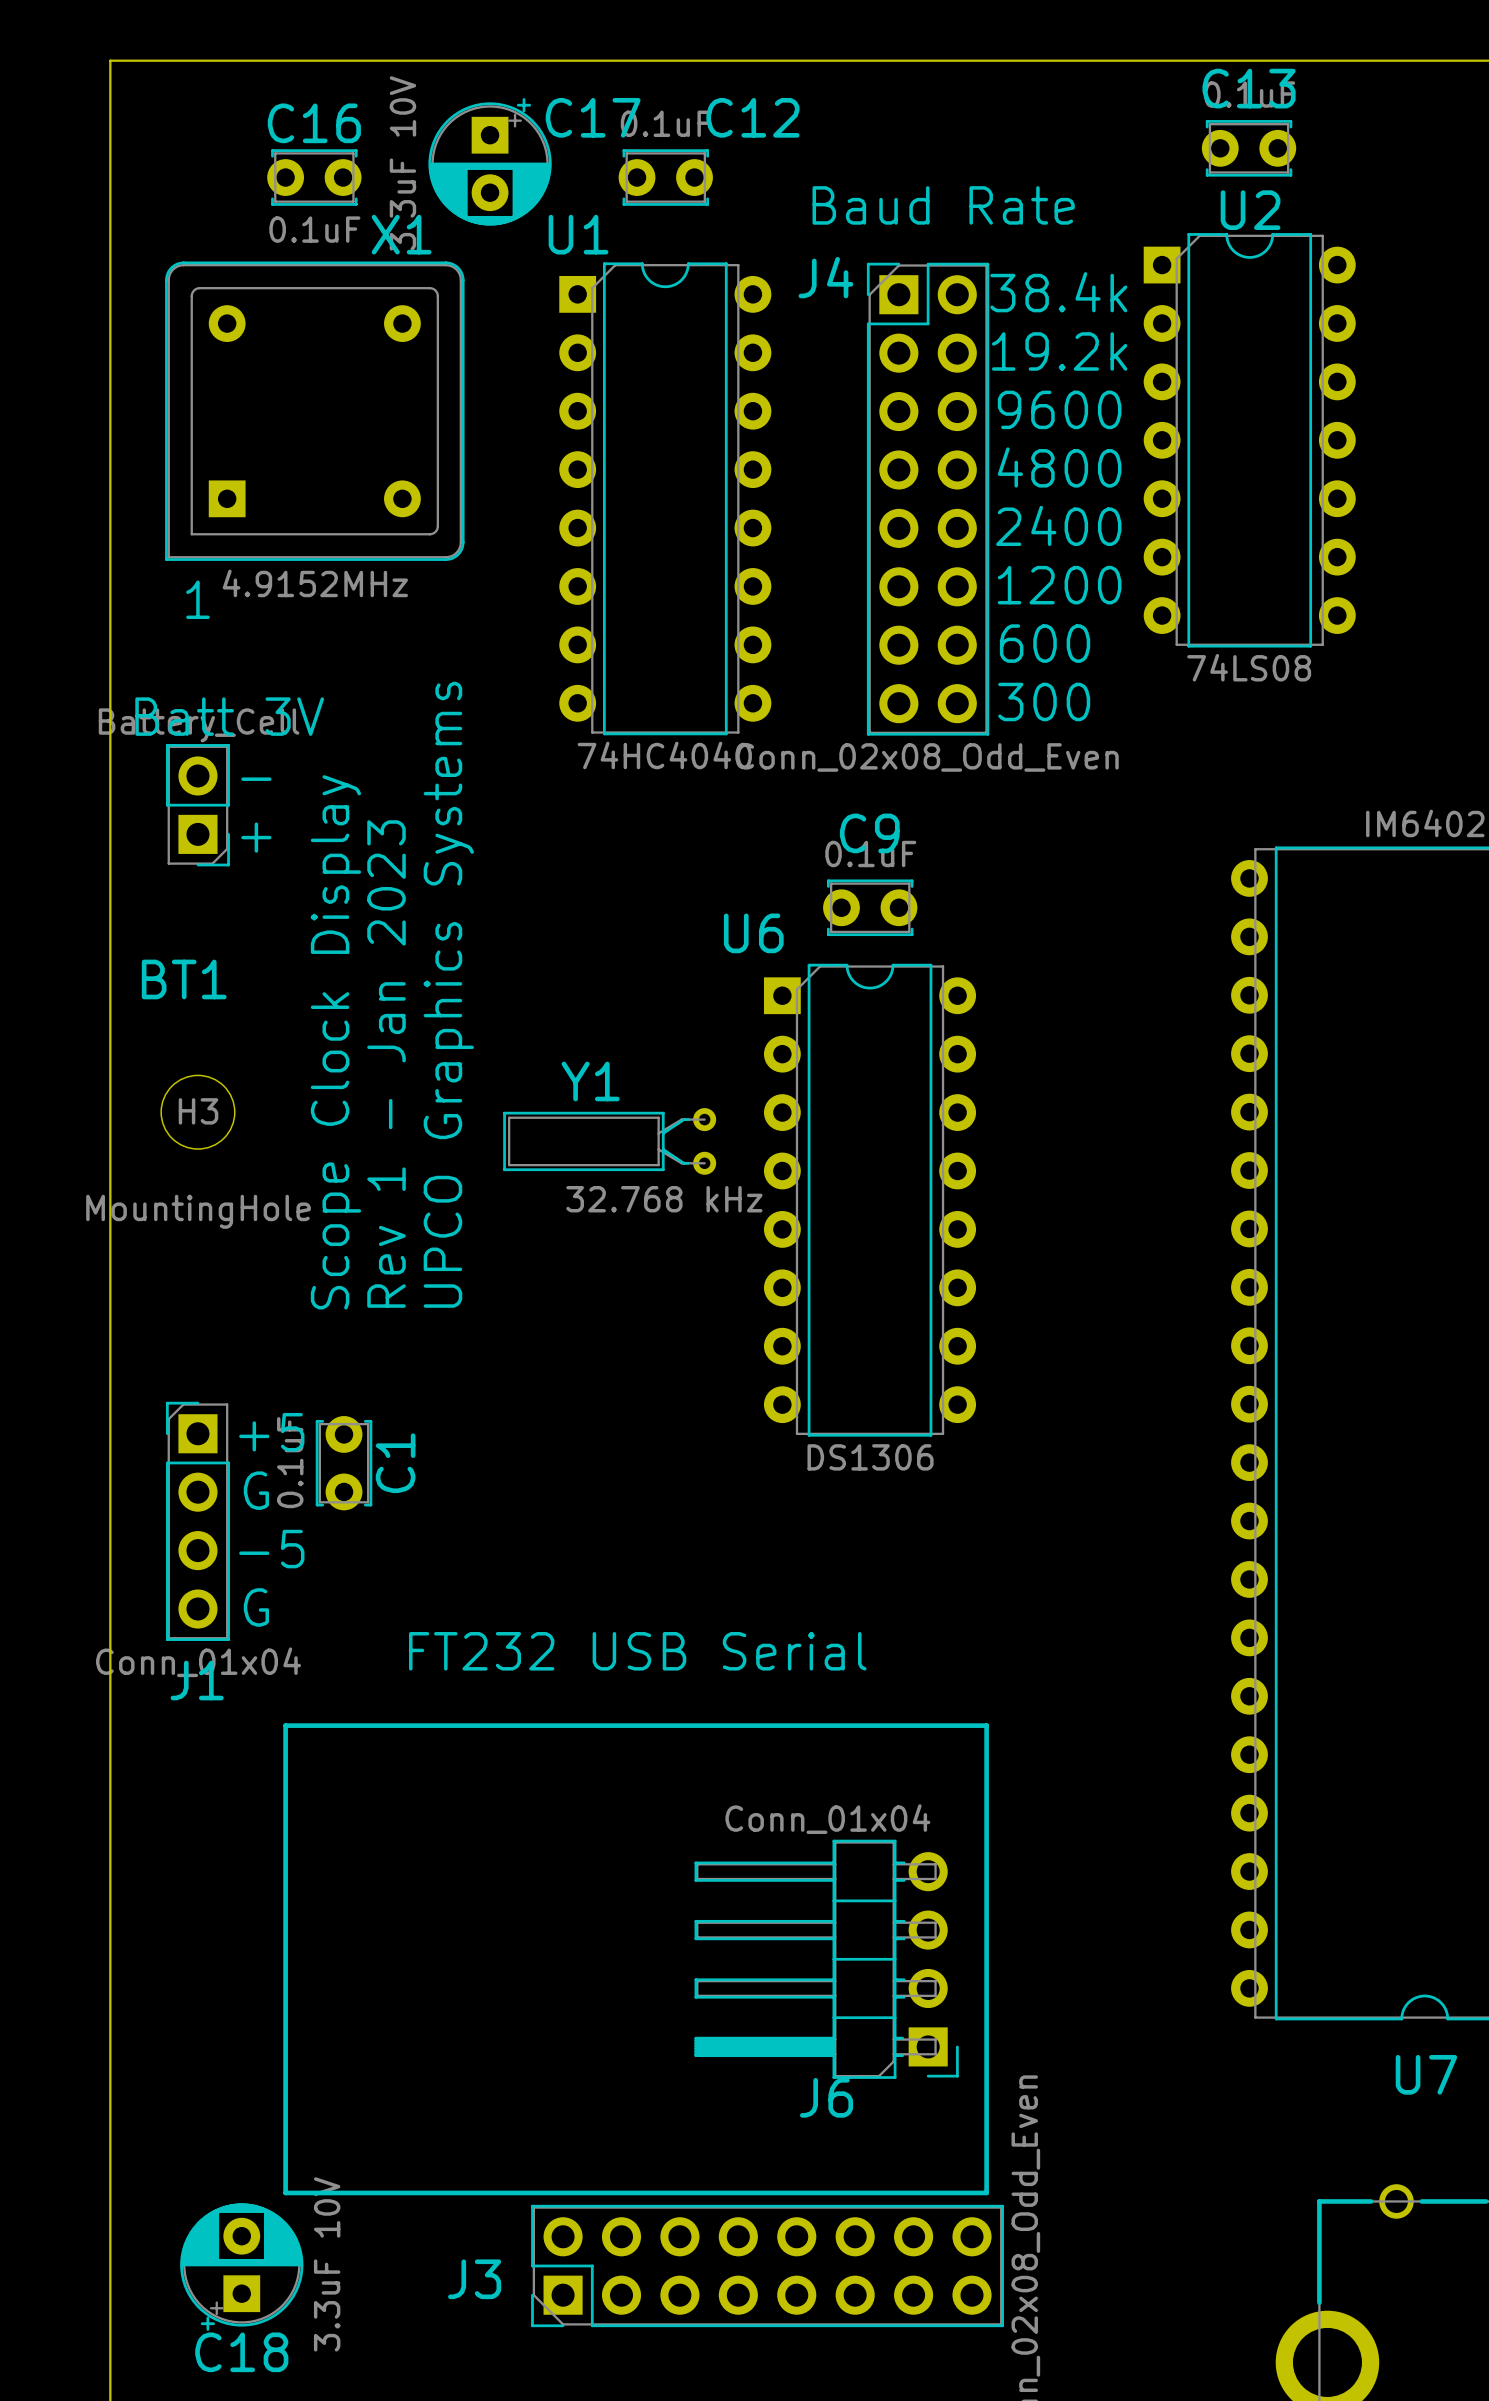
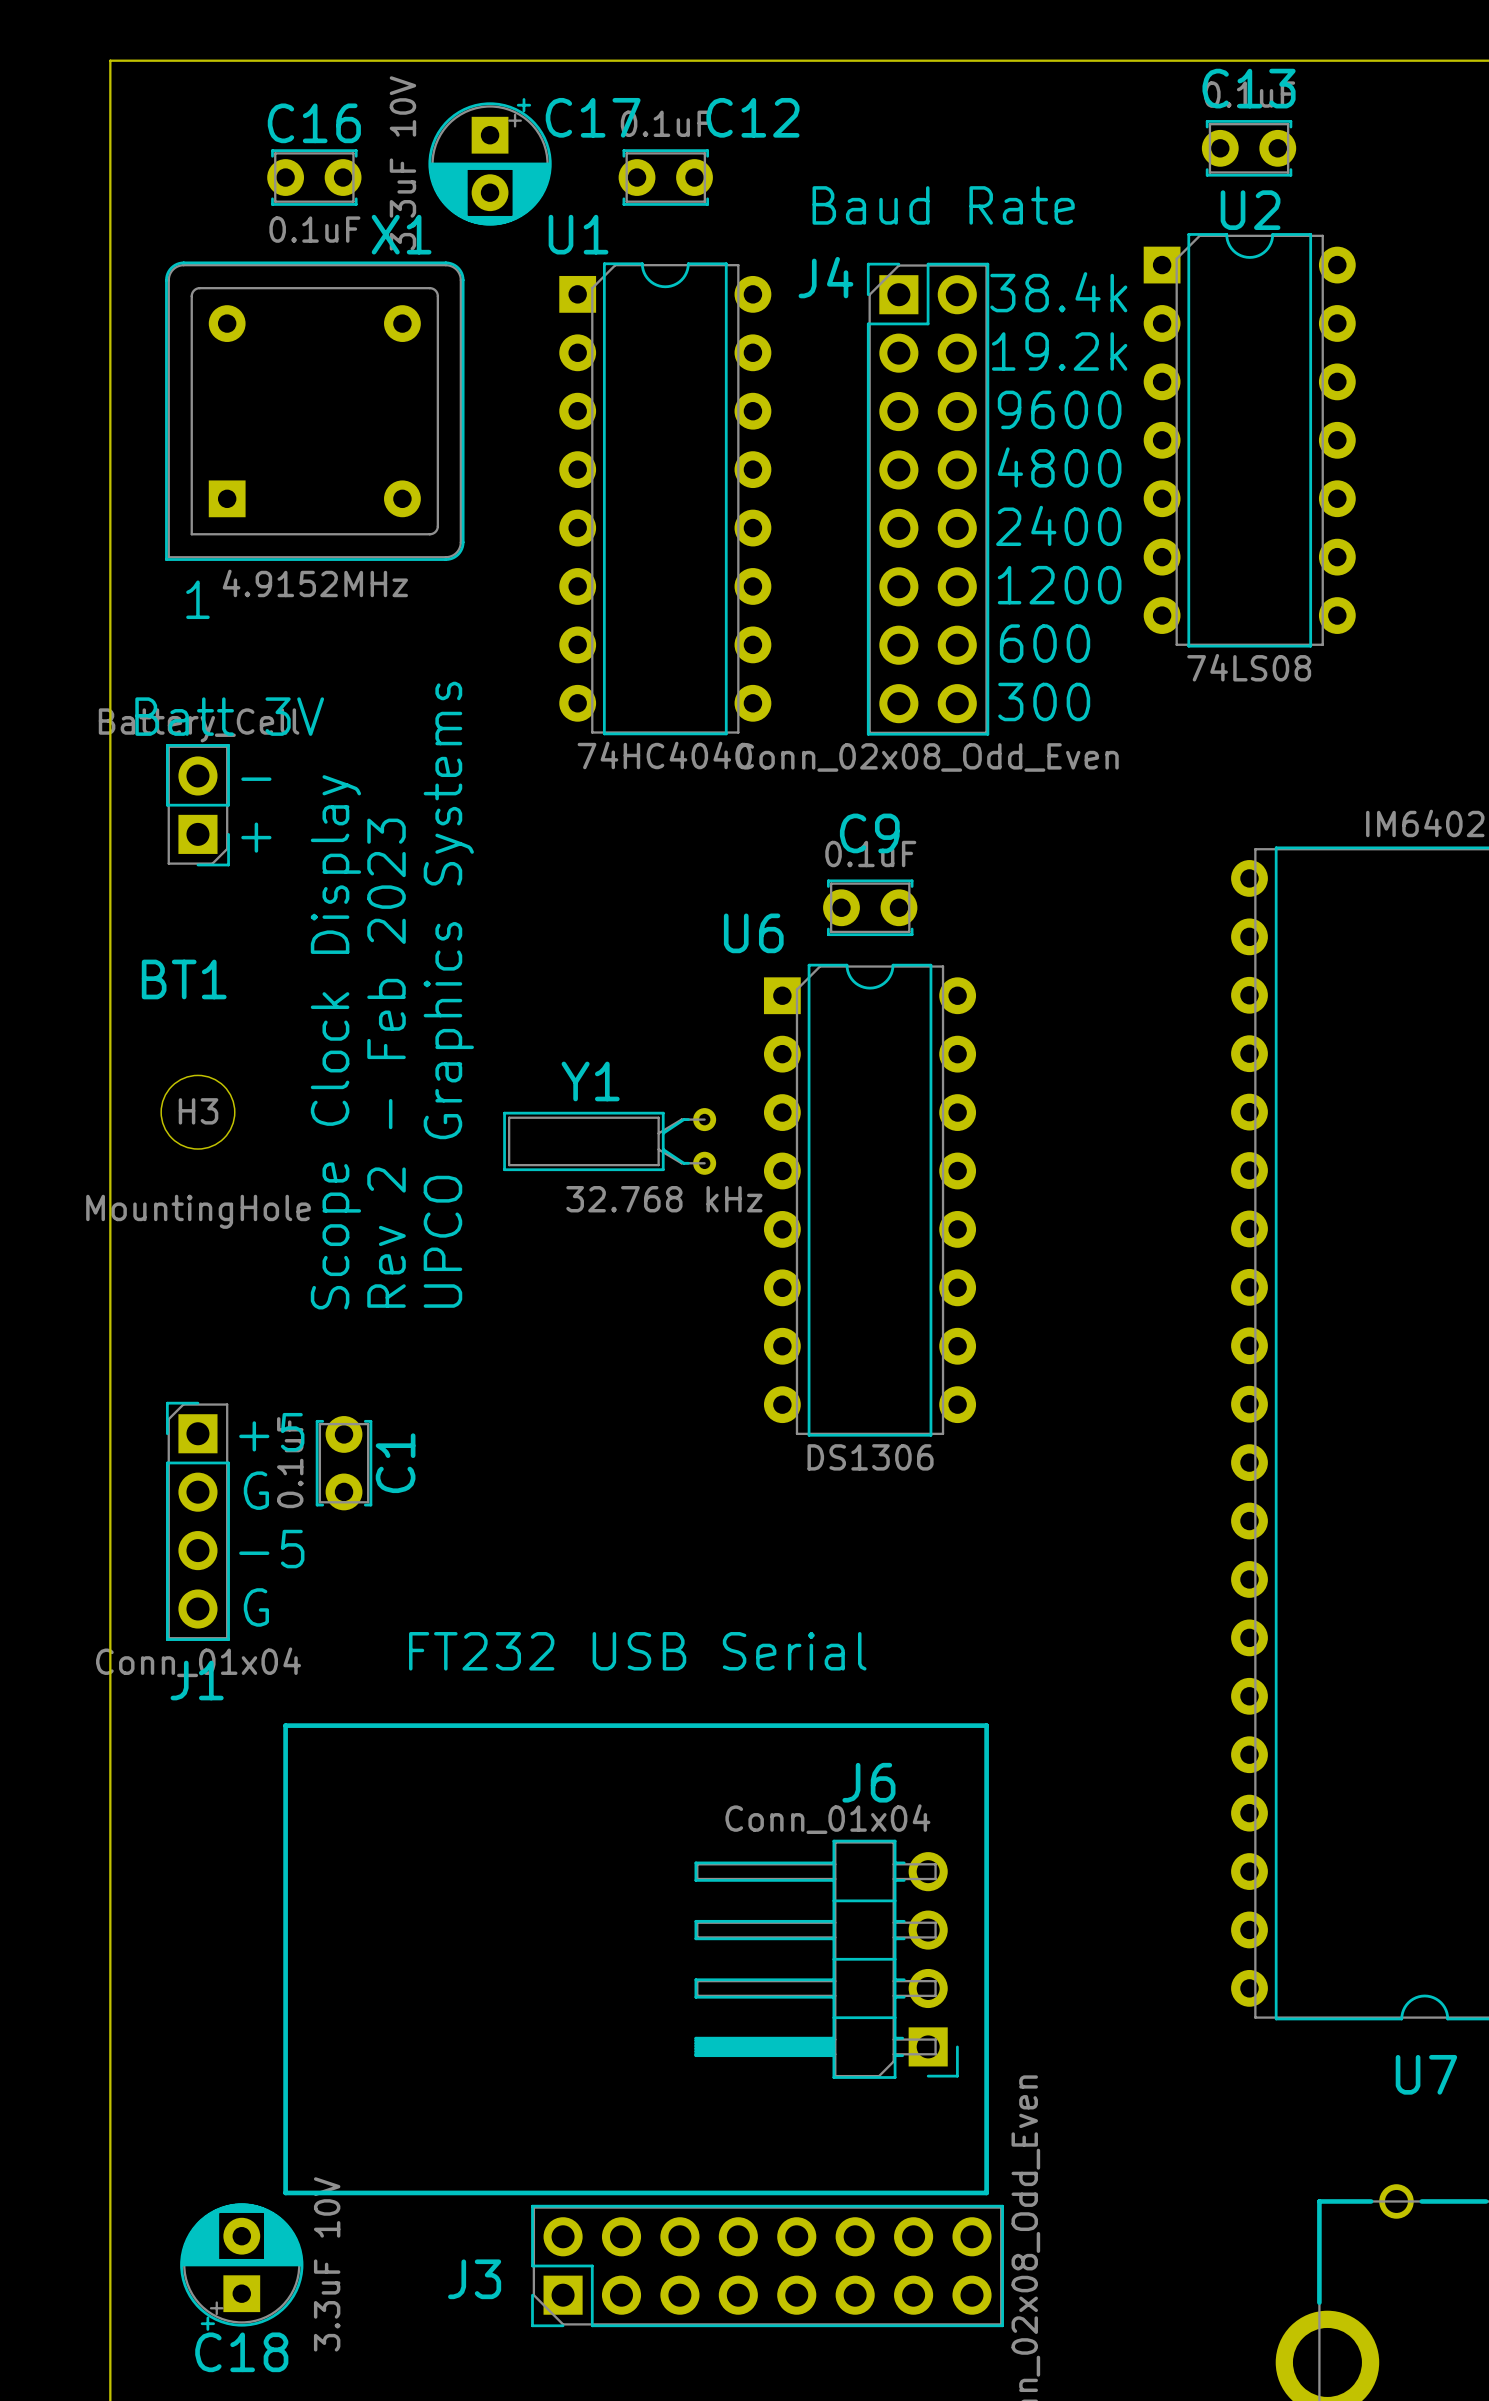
text: Rev 1 - Jan 2023 (386, 1064) -> Rev 2 - Feb 2023 (386, 1063)
J6 name position: J6 (826, 2097) -> J6 (868, 1782)

